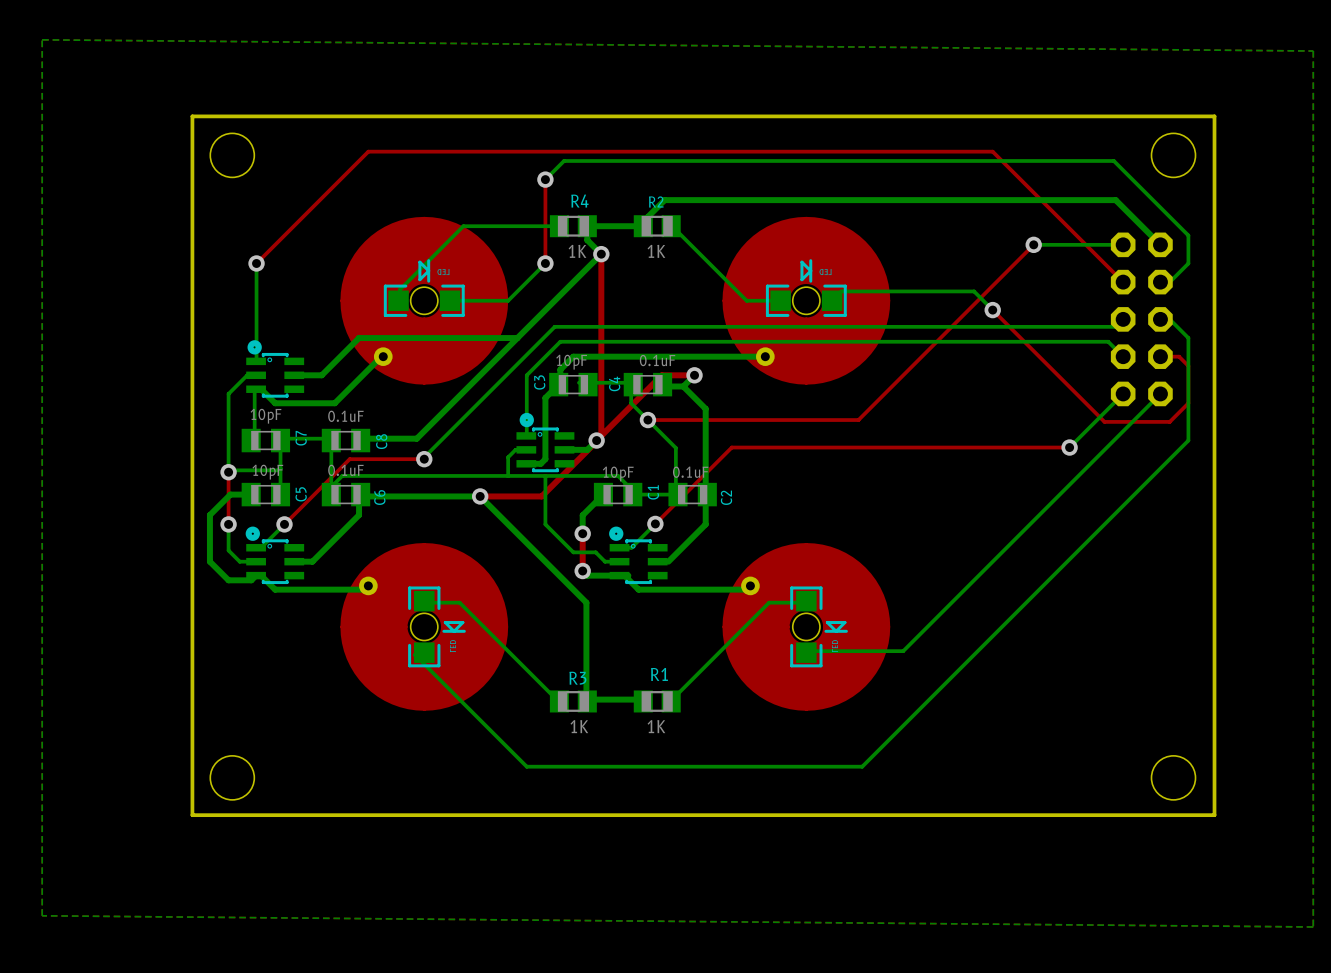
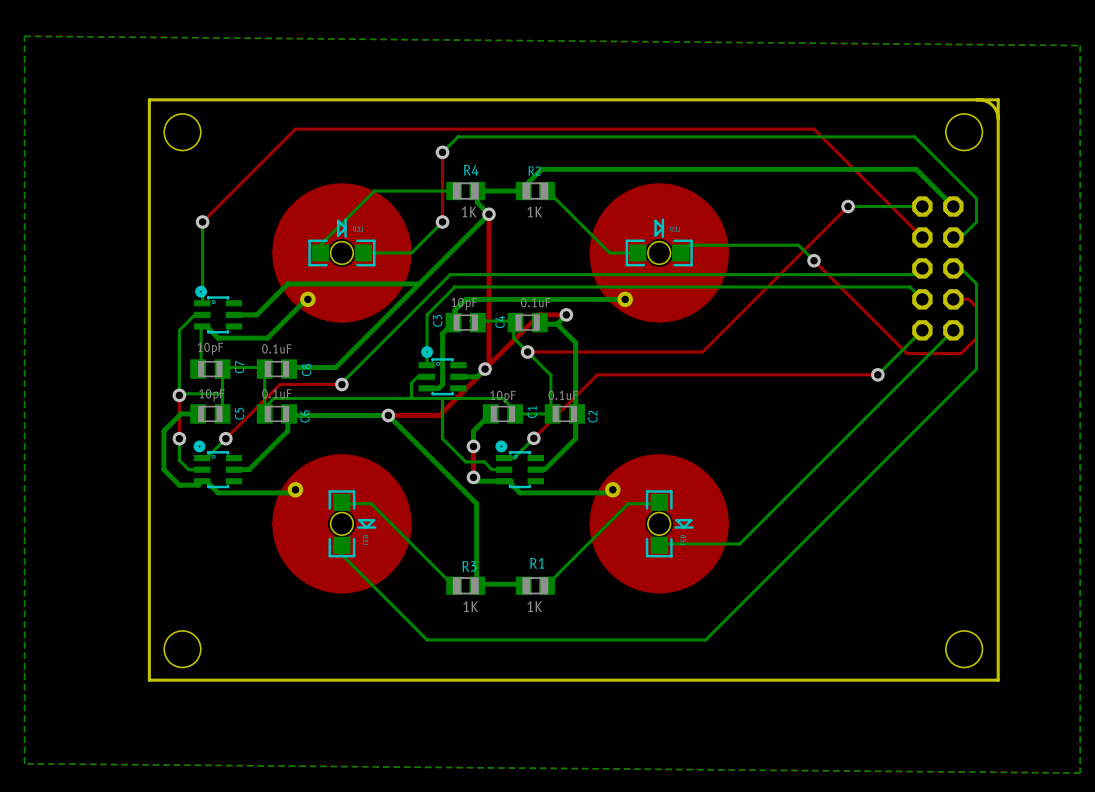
board edge: none -> (976, 99) (985, 100) (991, 104) (995, 109) (998, 118)

